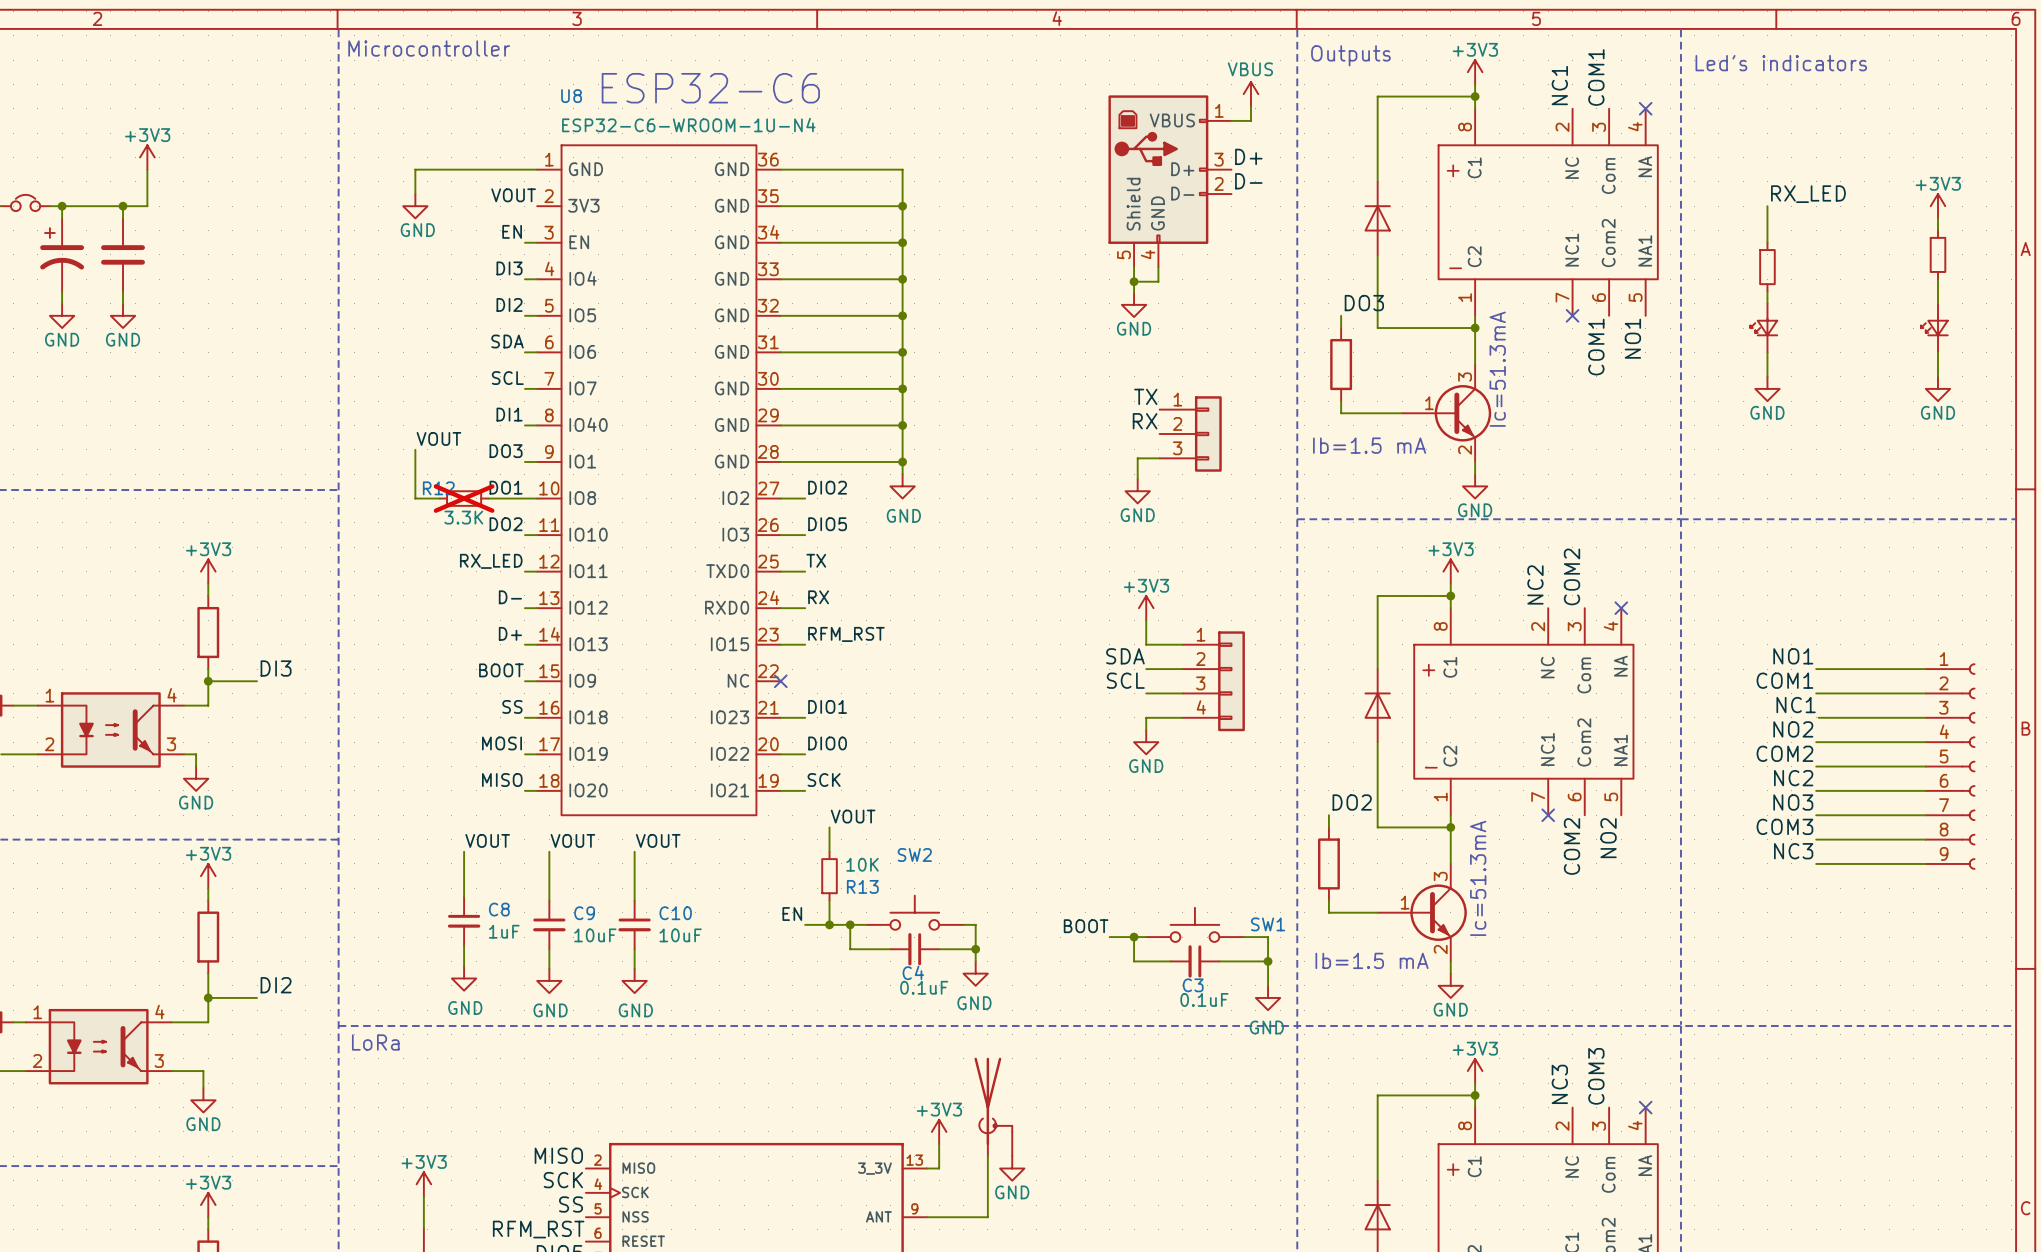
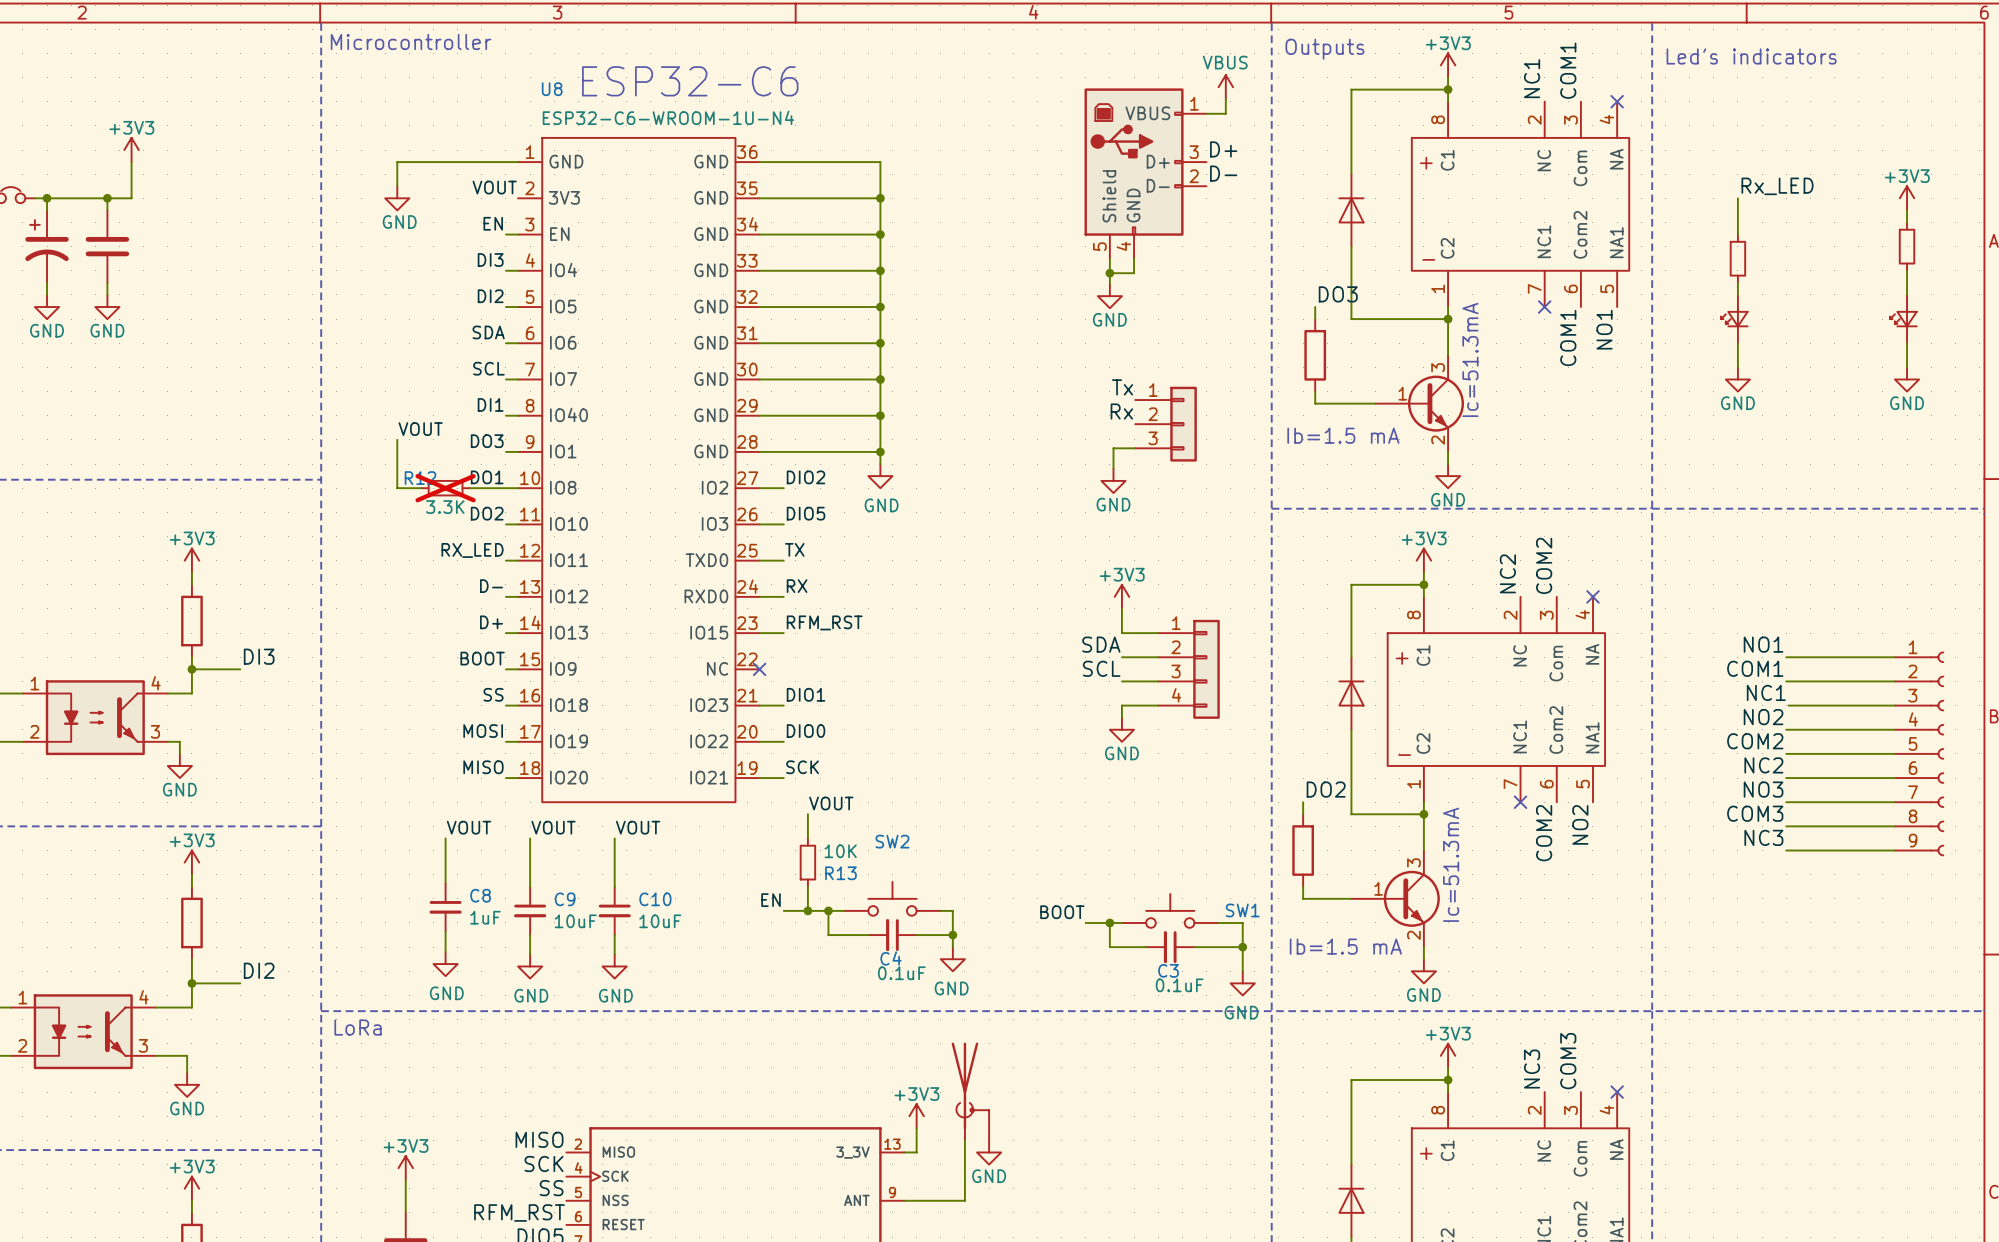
label: RX_LED (1808, 194) -> Rx_LED (1777, 186)
label: TX (1145, 396) -> Tx (1122, 387)
label: RX (1145, 421) -> Rx (1121, 411)

